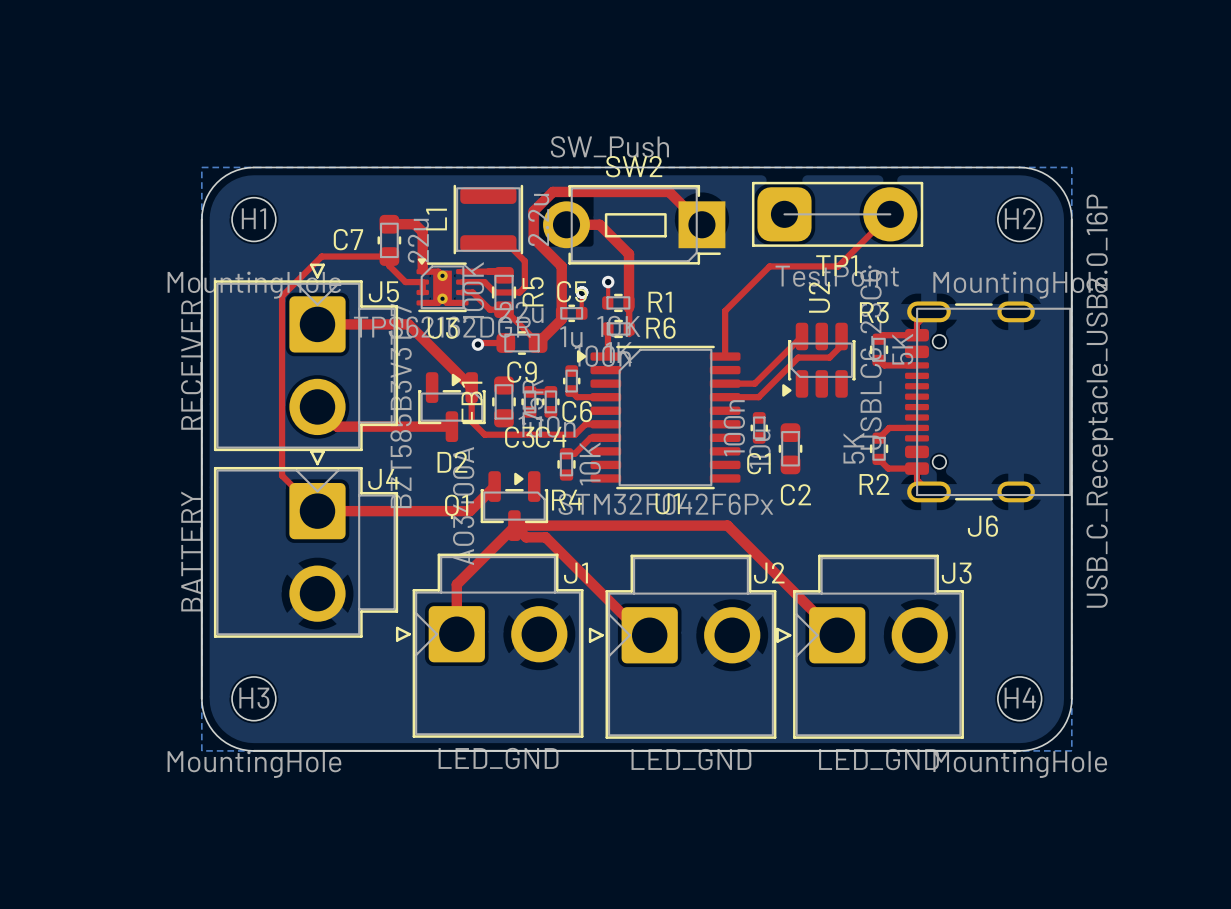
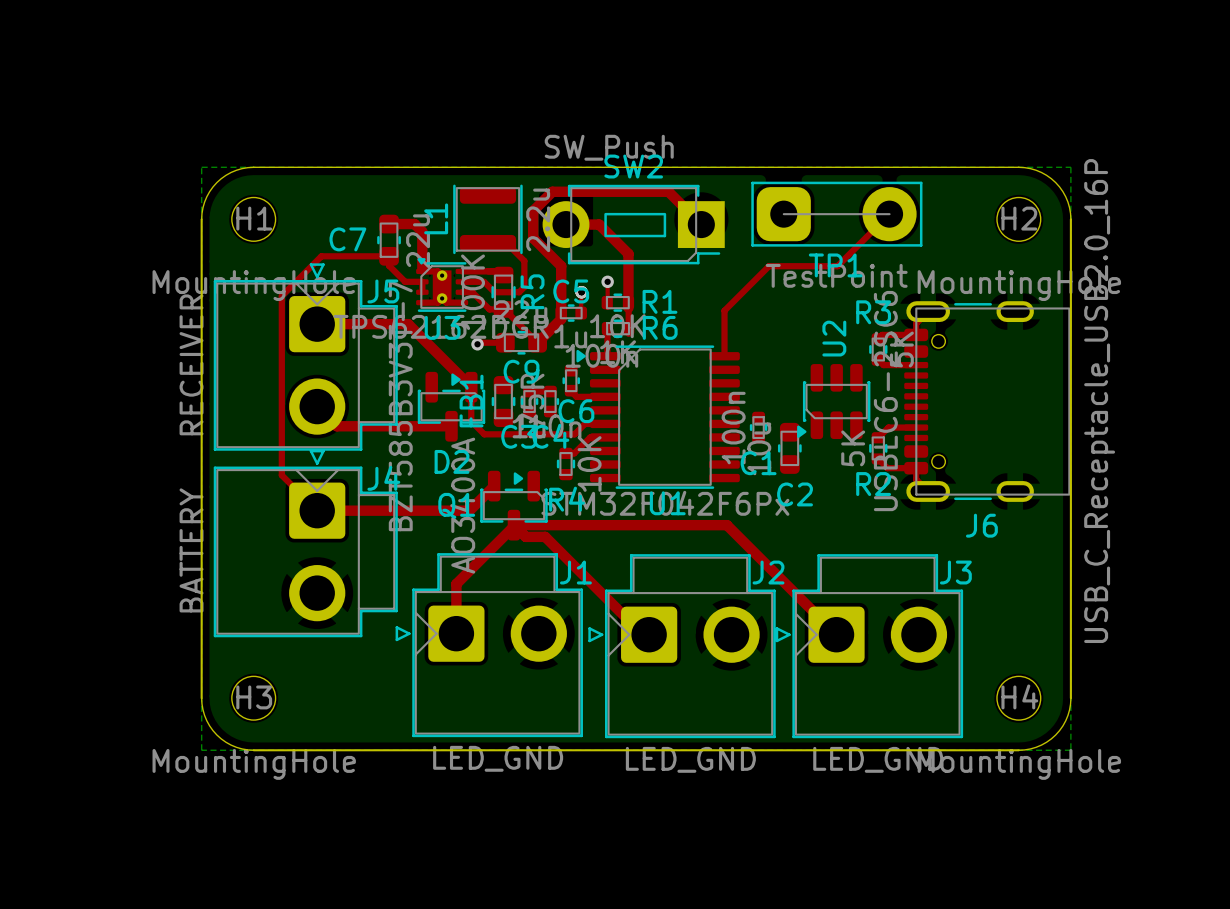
top track: (801, 336) (754, 383) (725, 383) -> none
top track: (841, 336) (841, 345) (829, 357) (798, 357) (758, 397) (725, 397) -> none
U2 position: (818, 360) -> (833, 401)

